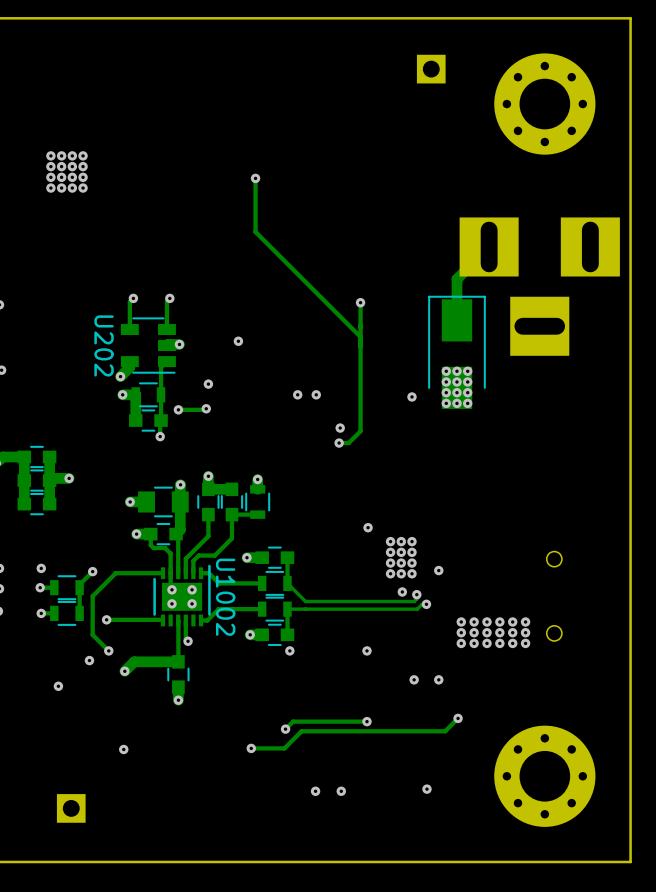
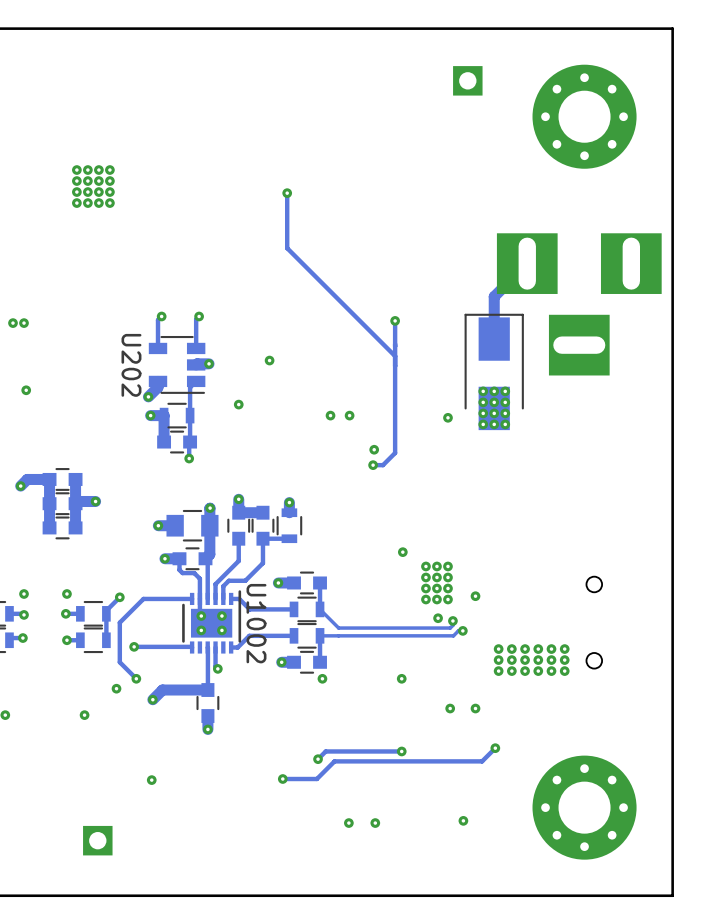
track: (206, 408) (178, 409) -> none
via: (206, 408) -> none
via: (178, 409) -> none

